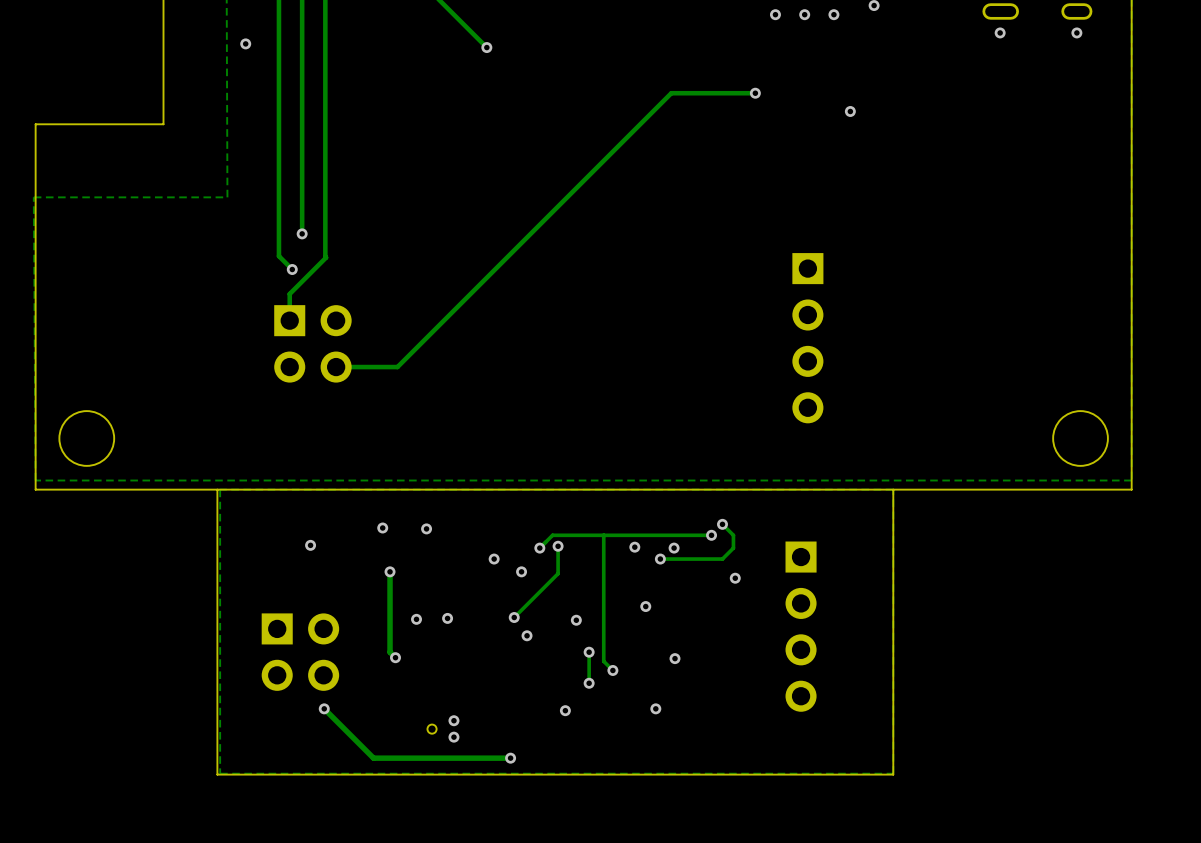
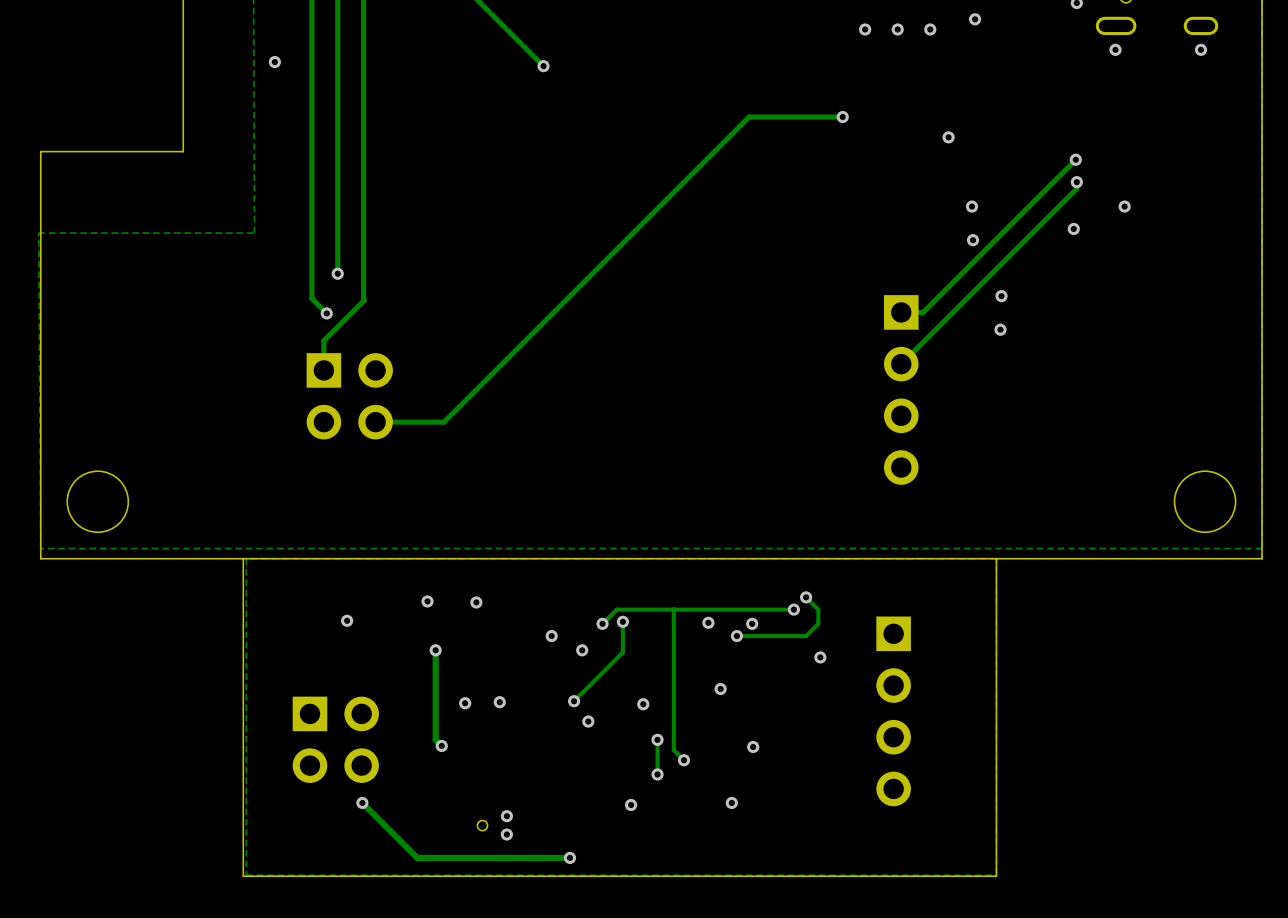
track: none -> (1075, 159) (923, 312) (901, 312)
via: none -> (1075, 159)
track: none -> (1076, 182) (1076, 188) (901, 364)
via: none -> (1076, 182)
via: none -> (971, 206)
via: none -> (1124, 206)
via: none -> (1073, 228)
via: none -> (973, 240)
via: none -> (1001, 296)
via: none -> (1000, 329)

